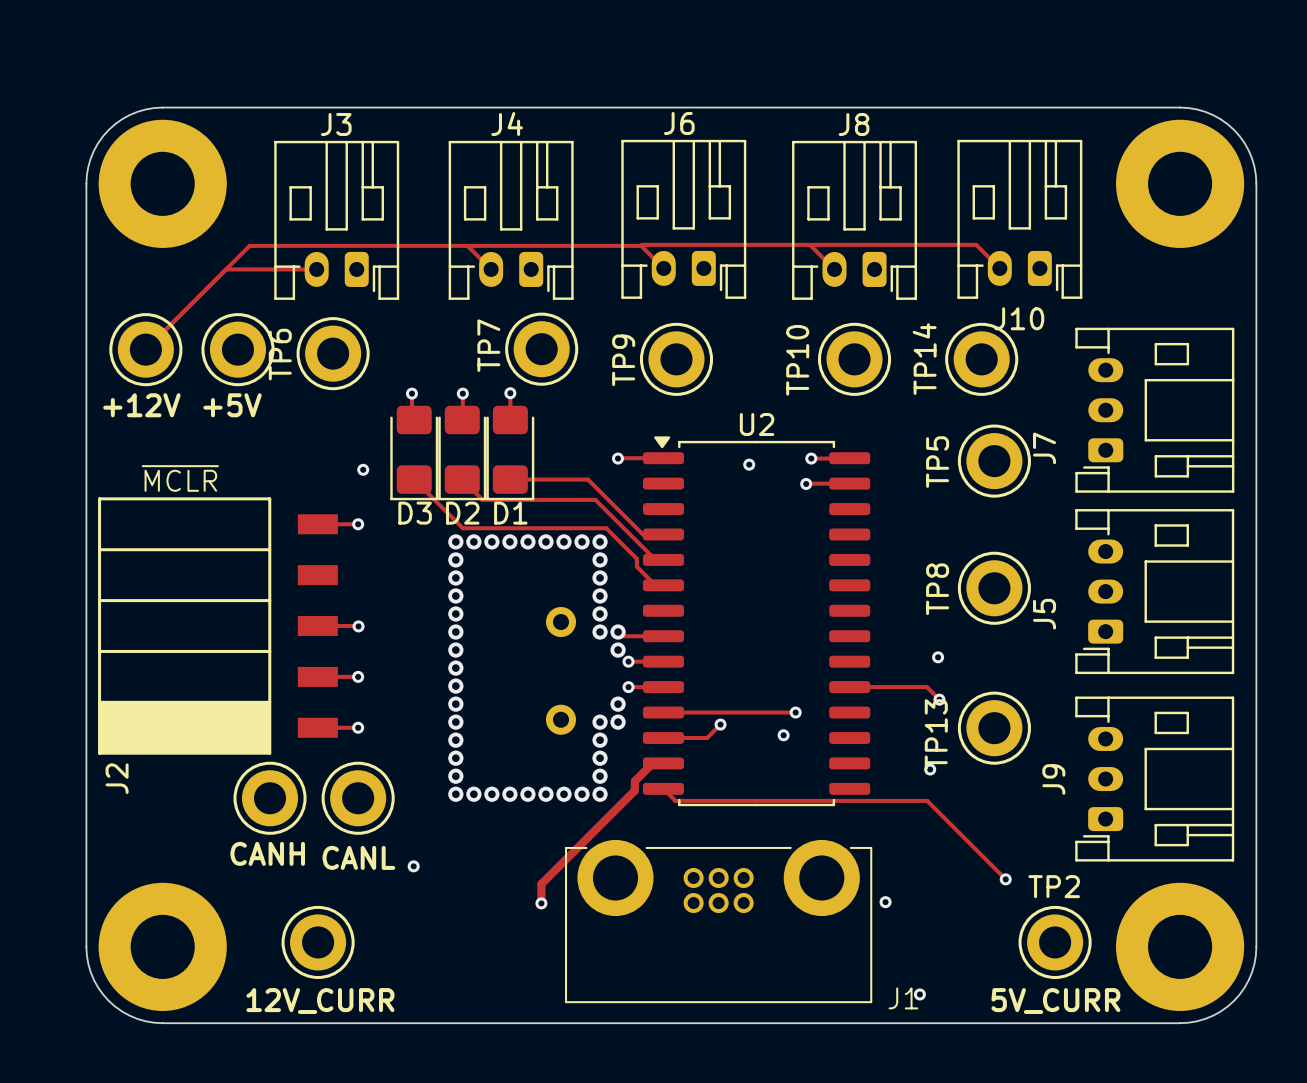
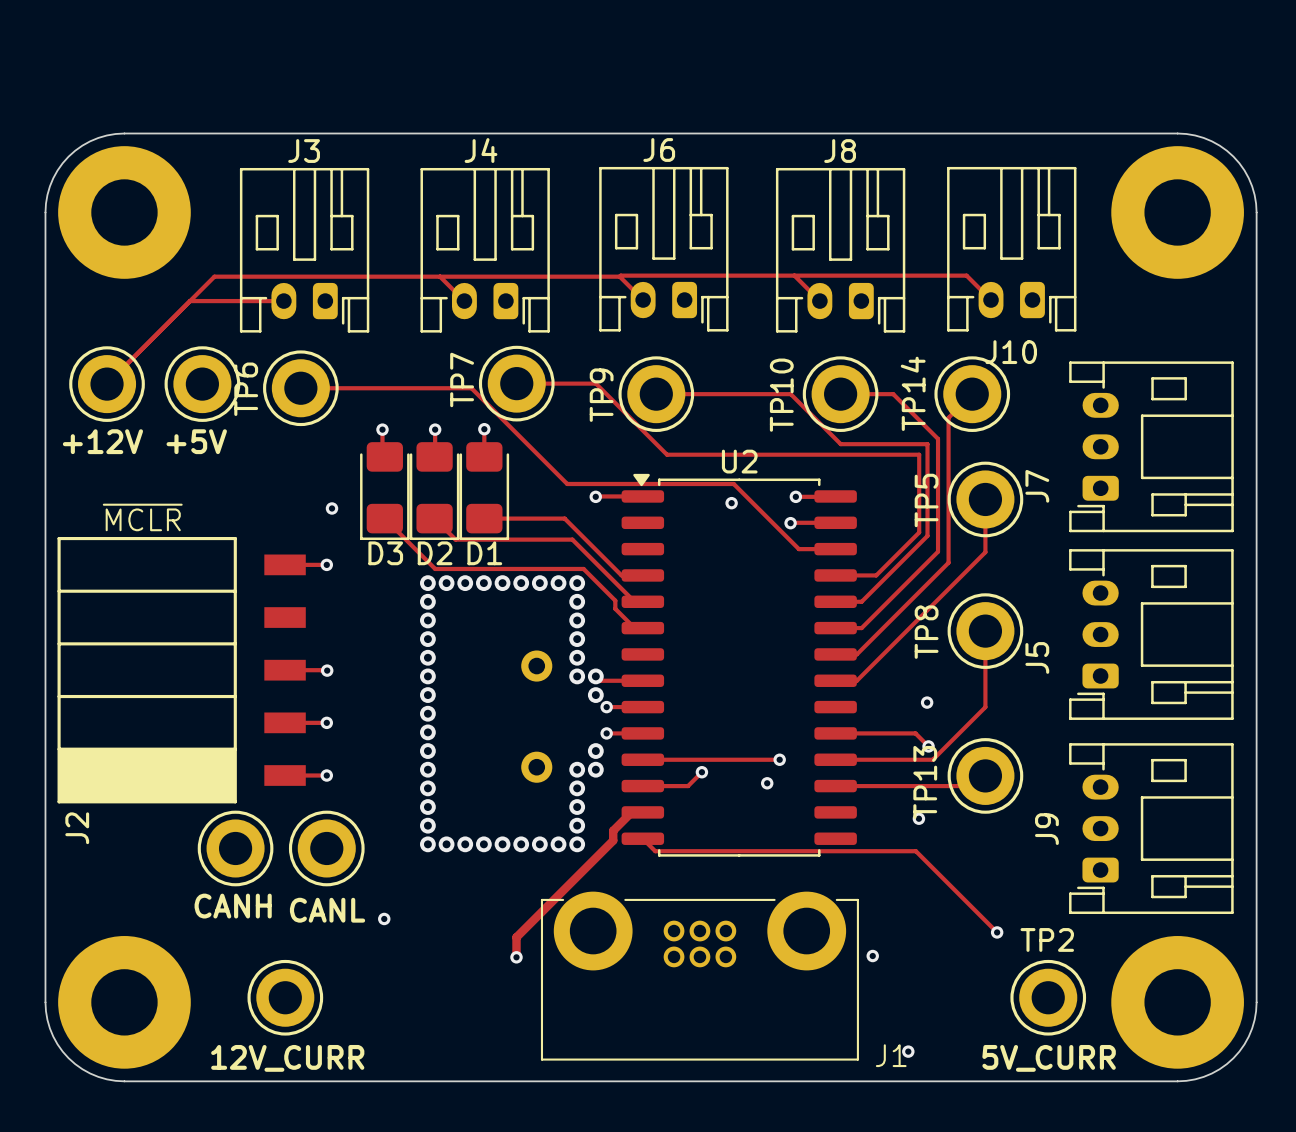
track: none -> (516, 383) (595, 383) (667, 454) (919, 454) (919, 532) (876, 575) (835, 575)
track: none -> (300, 388) (471, 388) (567, 483) (733, 483) (798, 549) (835, 549)
track: none -> (656, 394) (790, 394) (840, 444) (927, 444) (927, 535) (861, 601) (835, 601)
track: none -> (840, 394) (893, 394) (938, 438) (938, 551) (861, 628) (835, 628)
track: none -> (972, 394) (948, 417) (948, 562) (856, 654) (835, 654)
track: none -> (985, 499) (985, 552) (856, 680) (835, 680)
track: none -> (985, 631) (985, 707) (932, 759) (835, 759)
track: none -> (985, 775) (975, 786) (835, 786)

